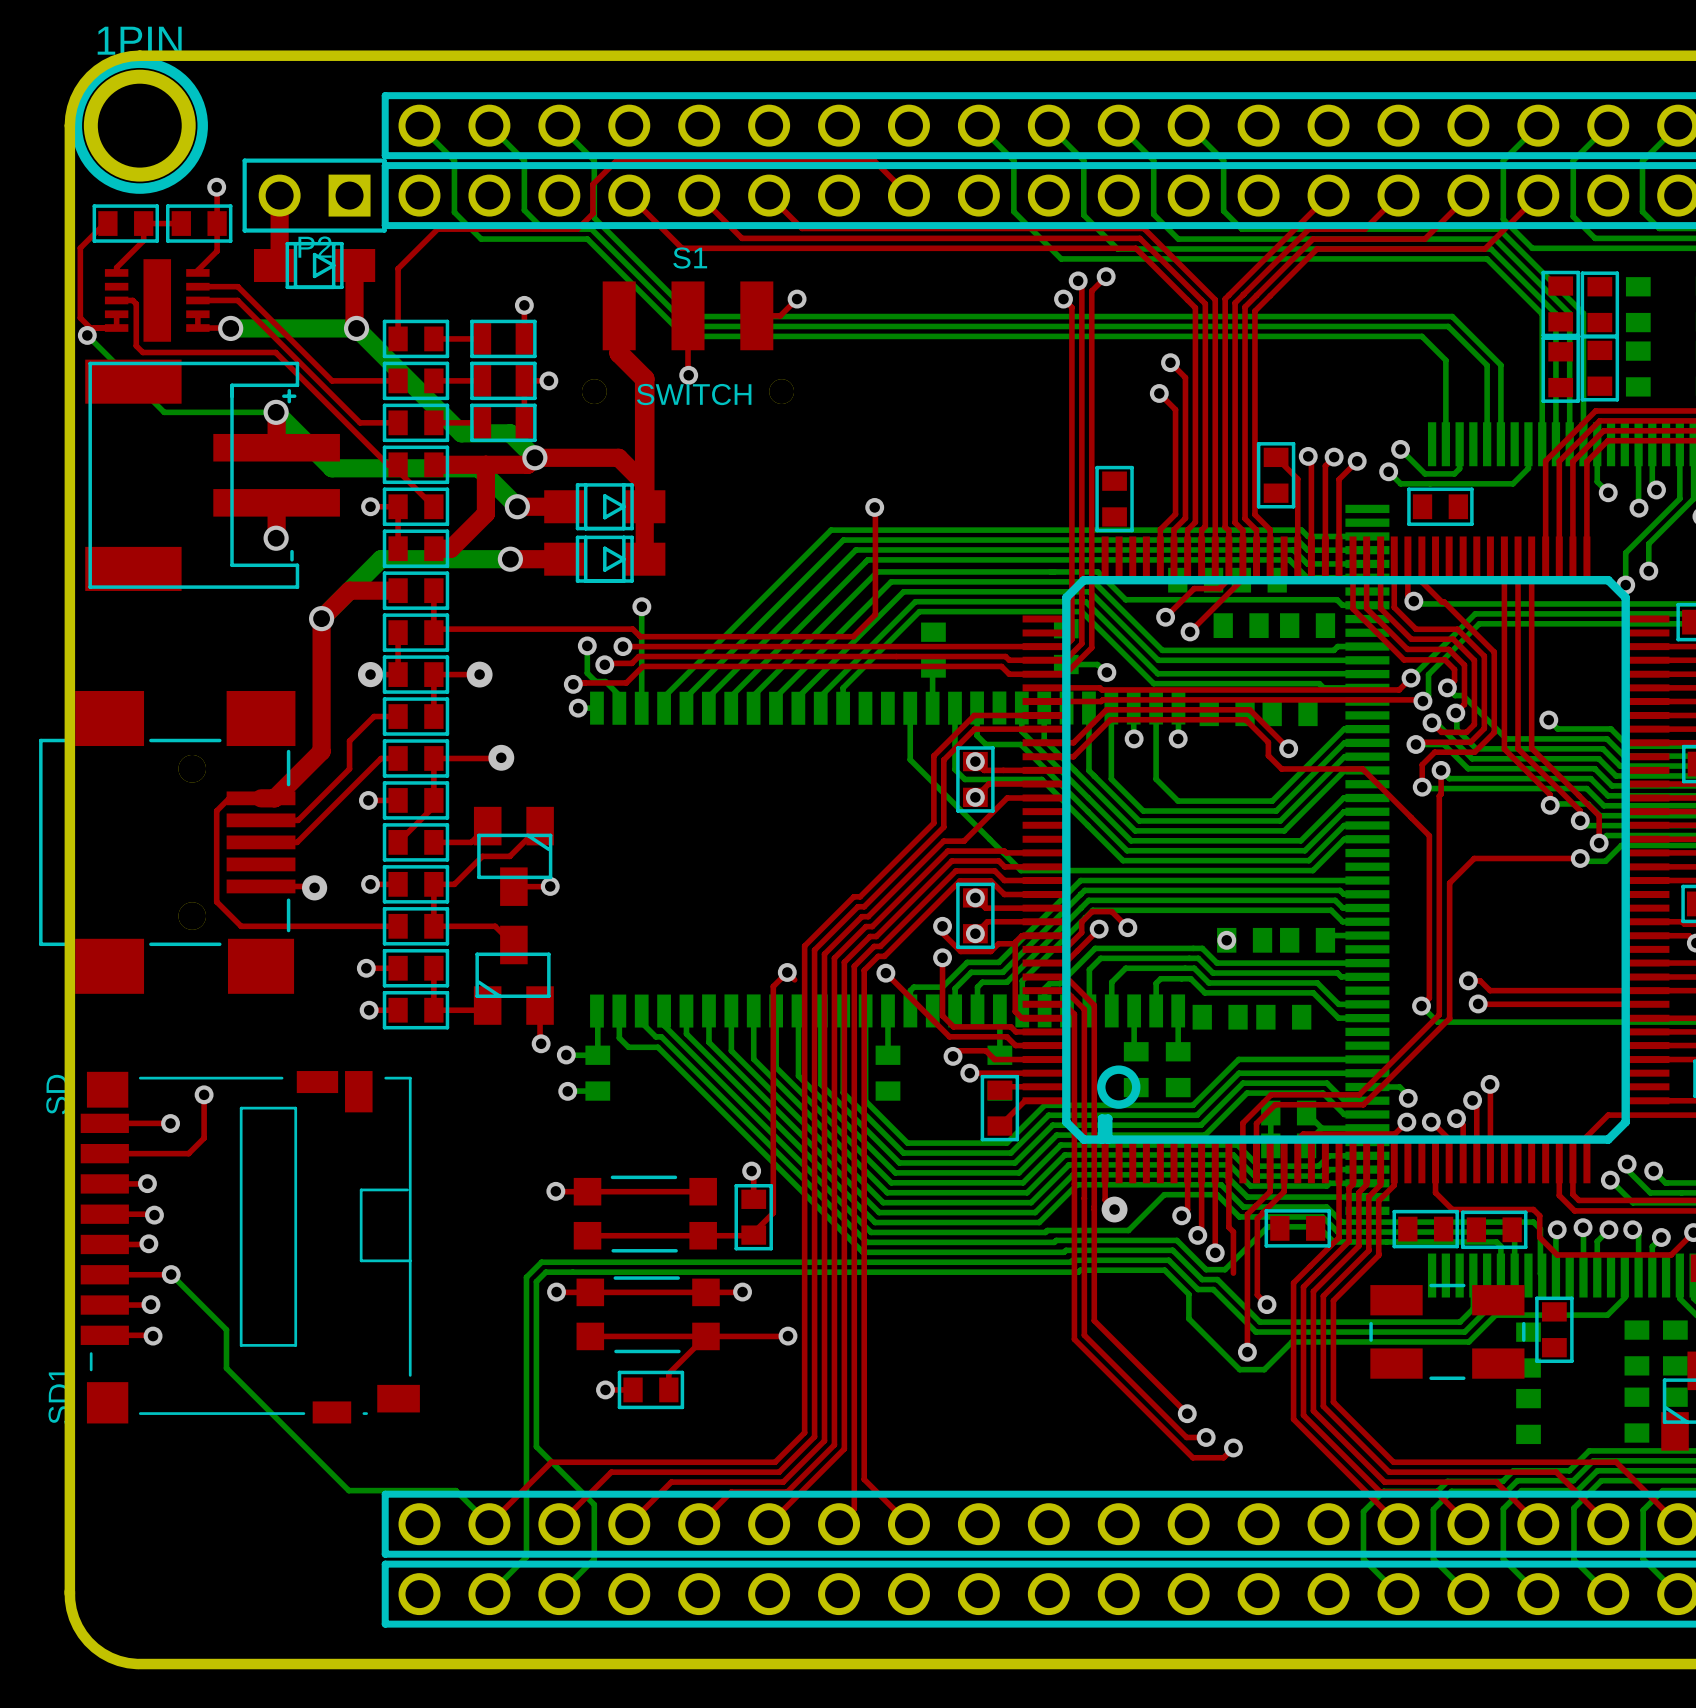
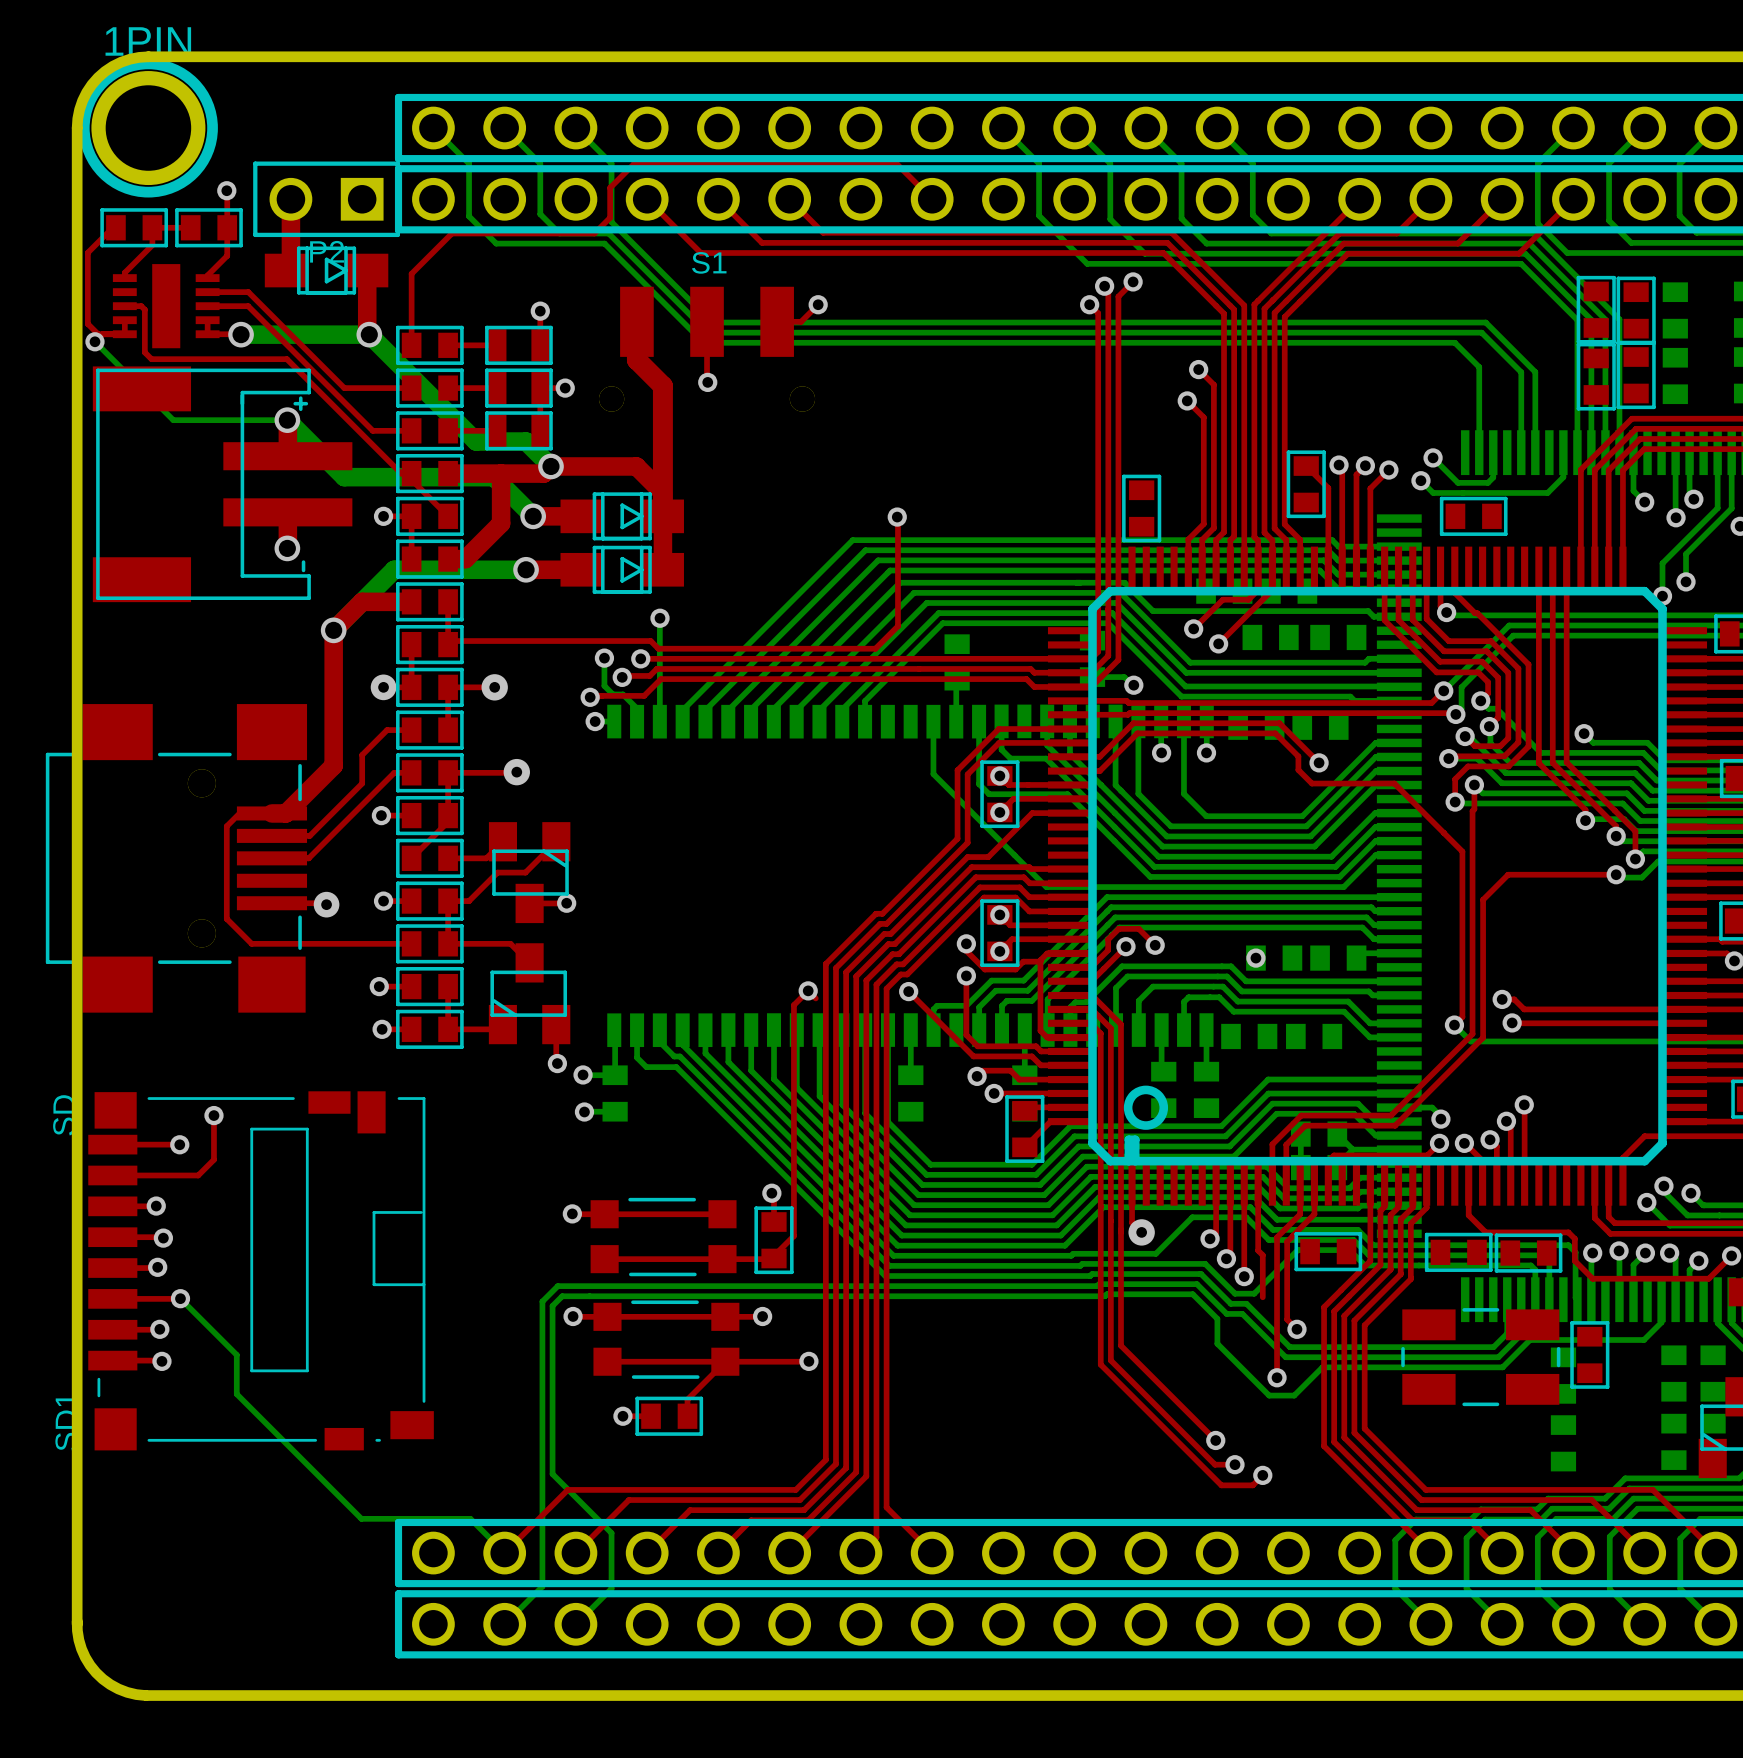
S1 value: SWITCH (694, 394) -> none

